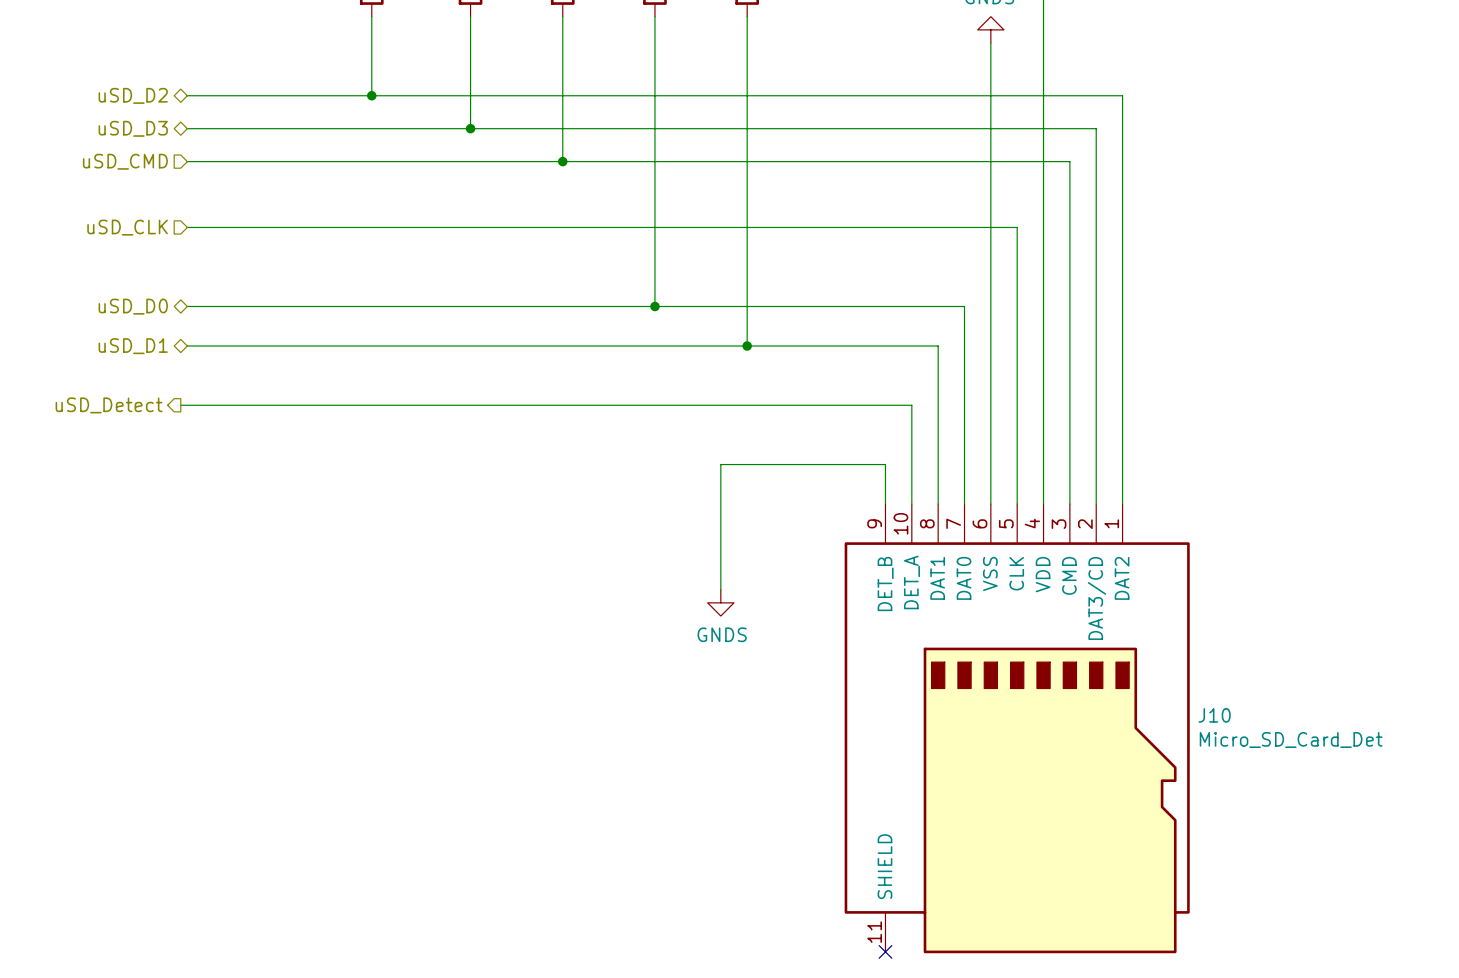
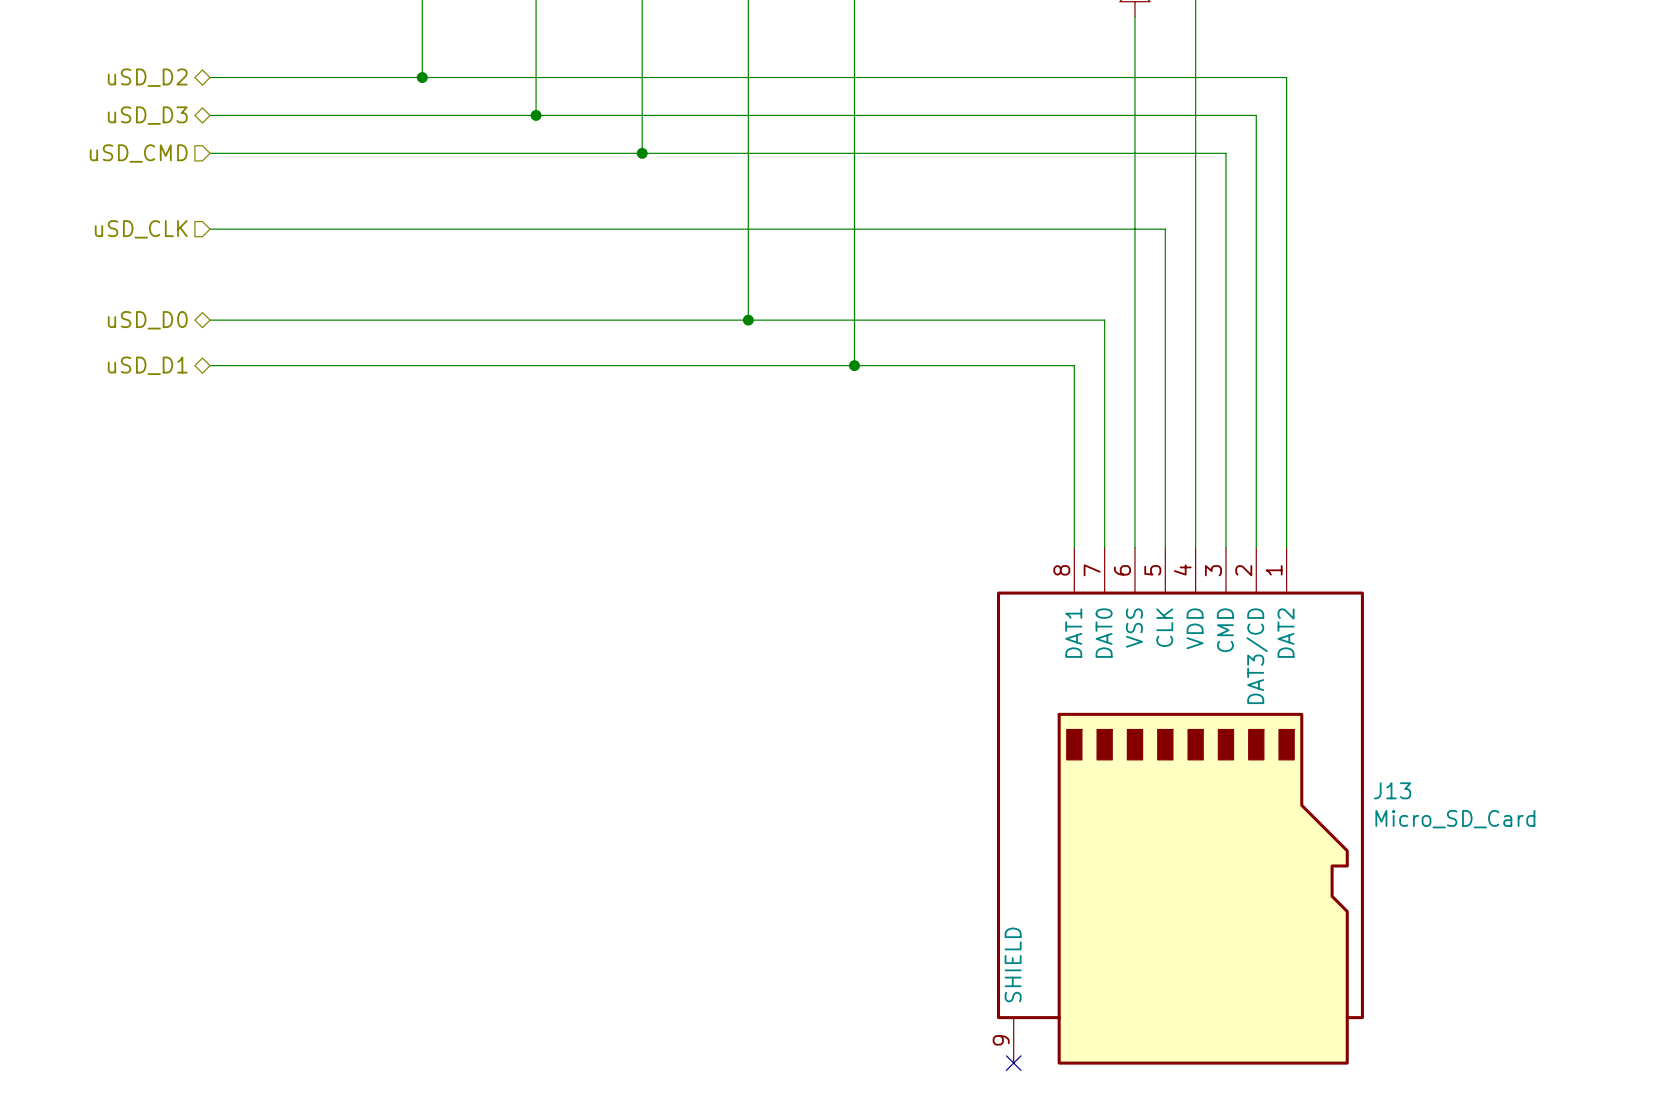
hierarchical label: uSD_Detect (109, 405) -> none
wire: (180, 405) (911, 405) (911, 504) -> none
wire: (885, 504) (885, 464) (720, 464) (720, 589) -> none
power symbol: GNDS (720, 602) -> none
J10: Micro_SD_Card_Det (1017, 728) -> none
J13: none -> Micro_SD_Card (1180, 806)

